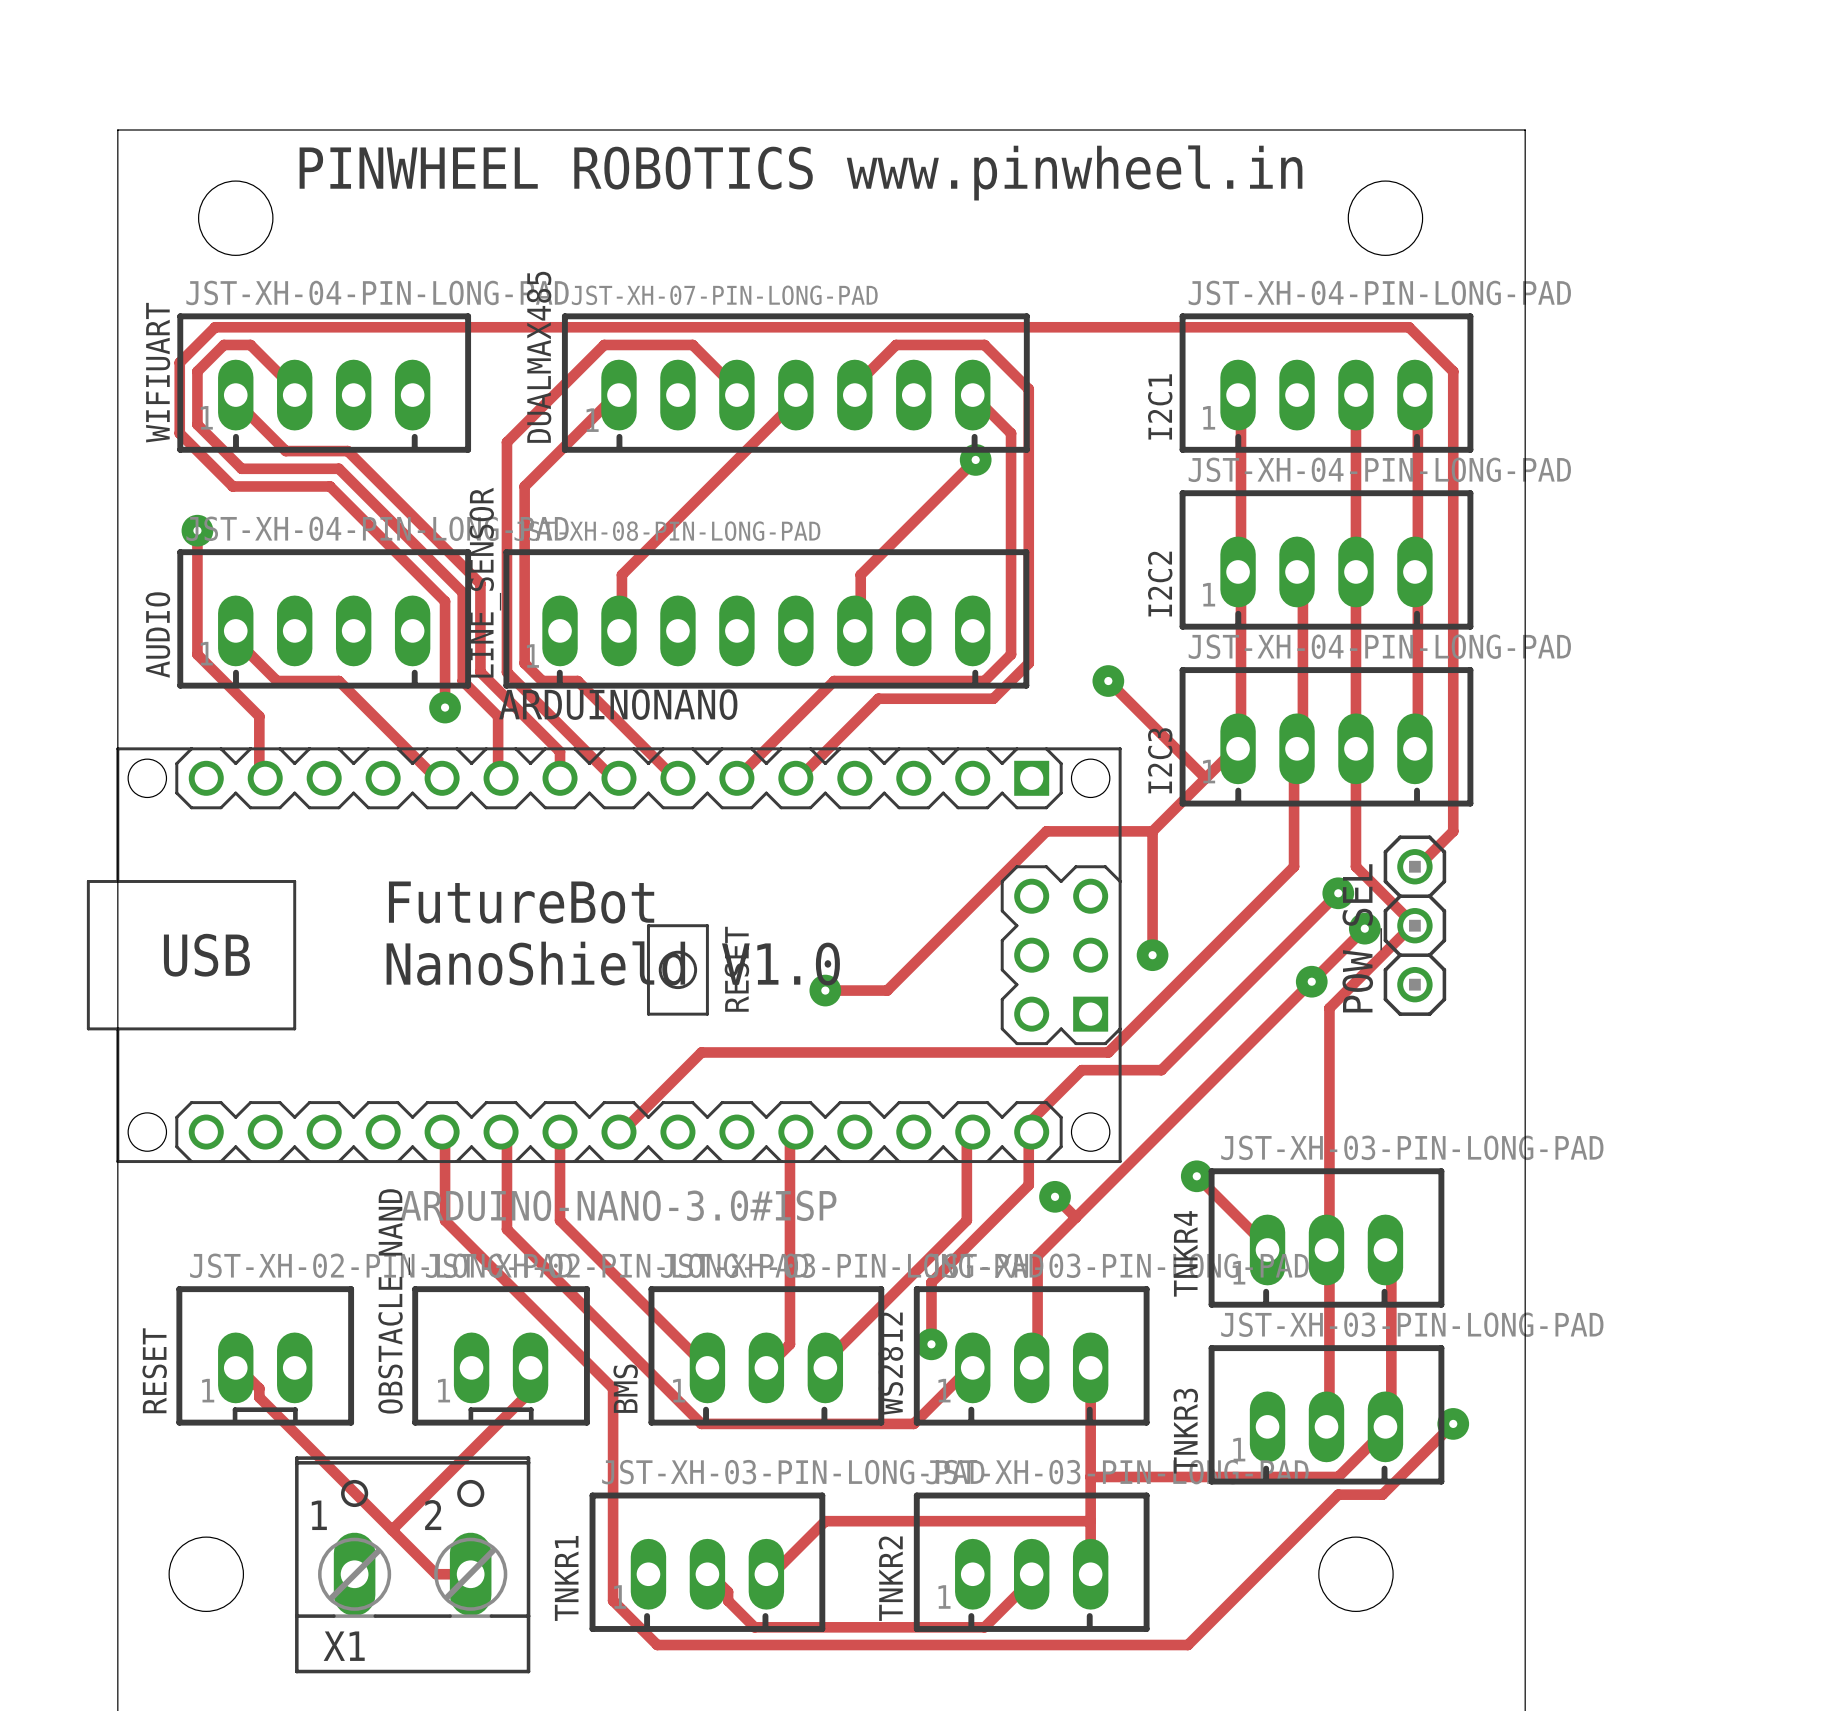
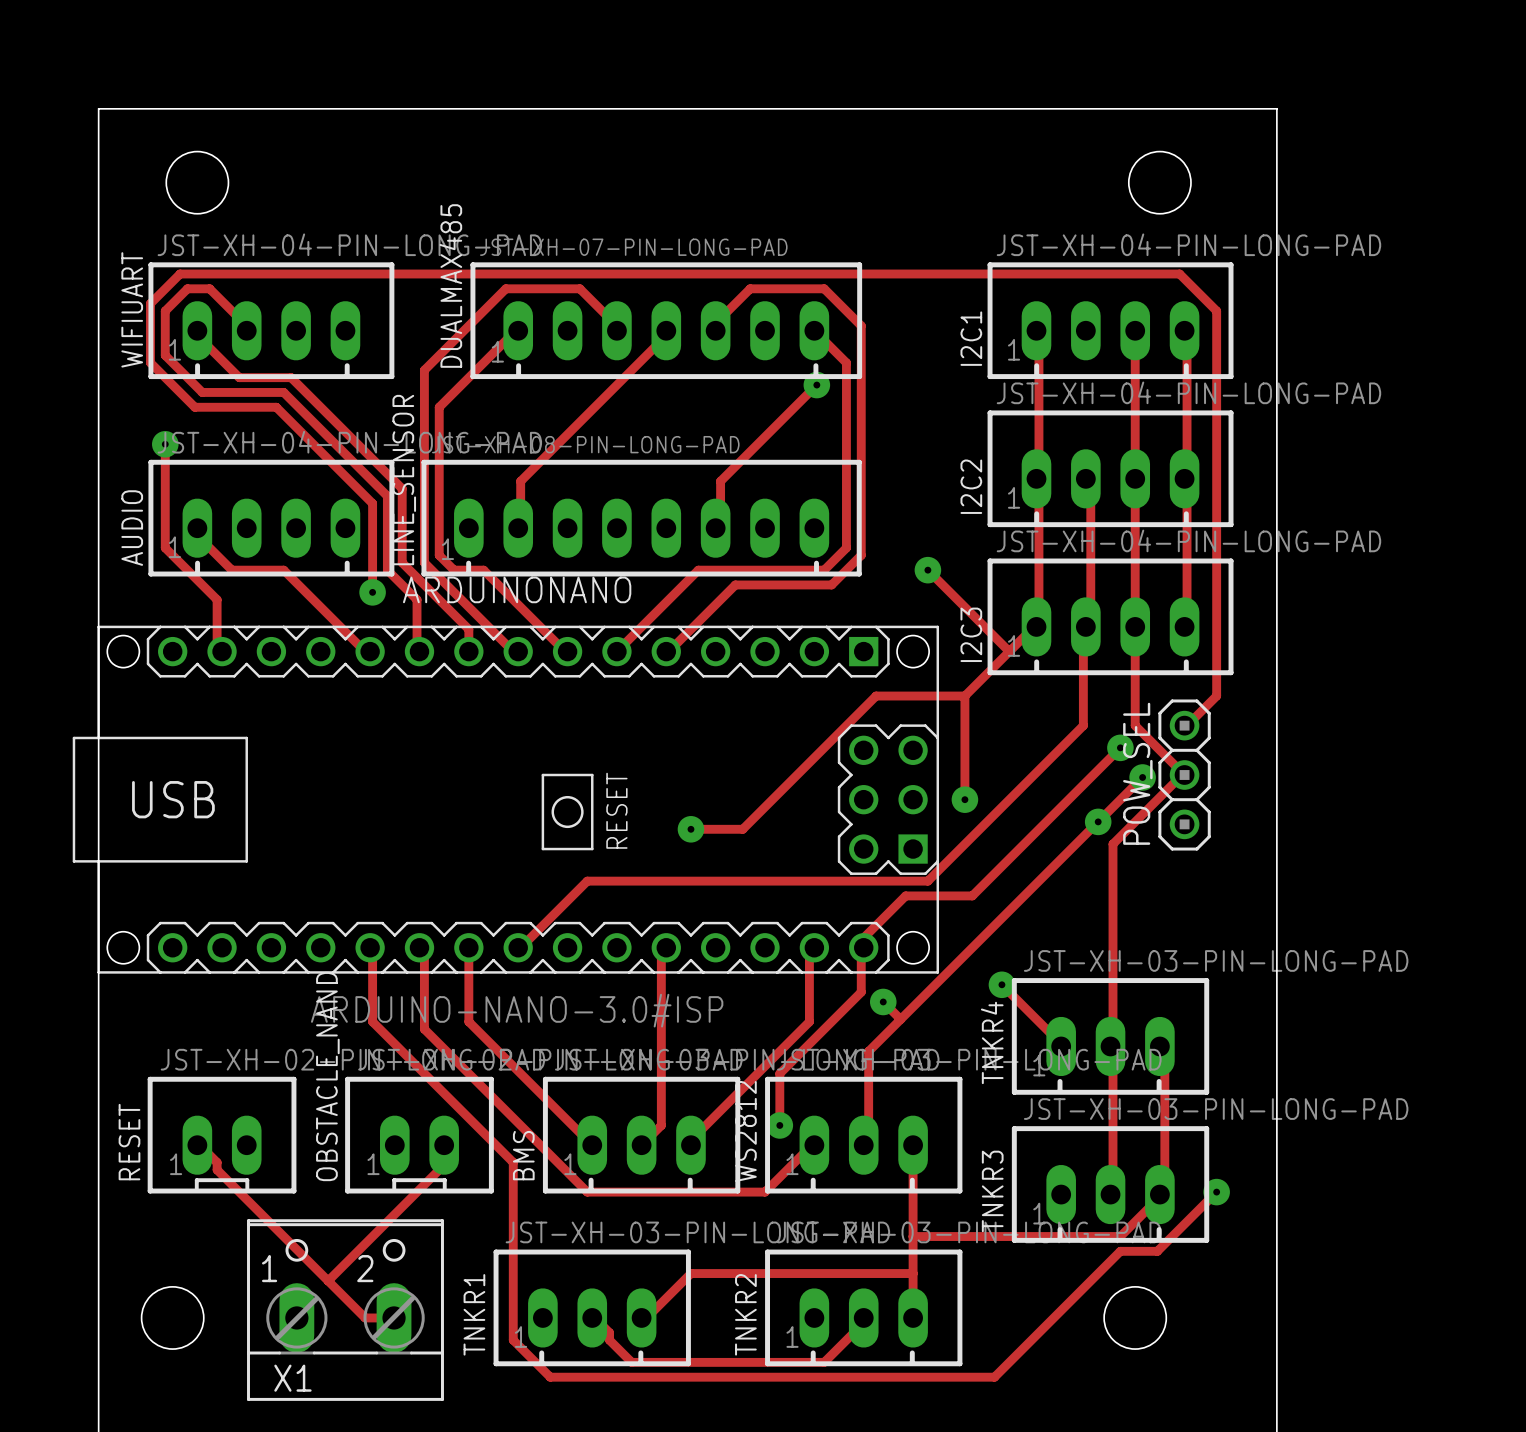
text: PINWHEEL ROBOTICS www.pinwheel.in (801, 172) -> none
text: FutureBot (521, 902) -> none
text: NanoShield V1.0 (613, 963) -> none

